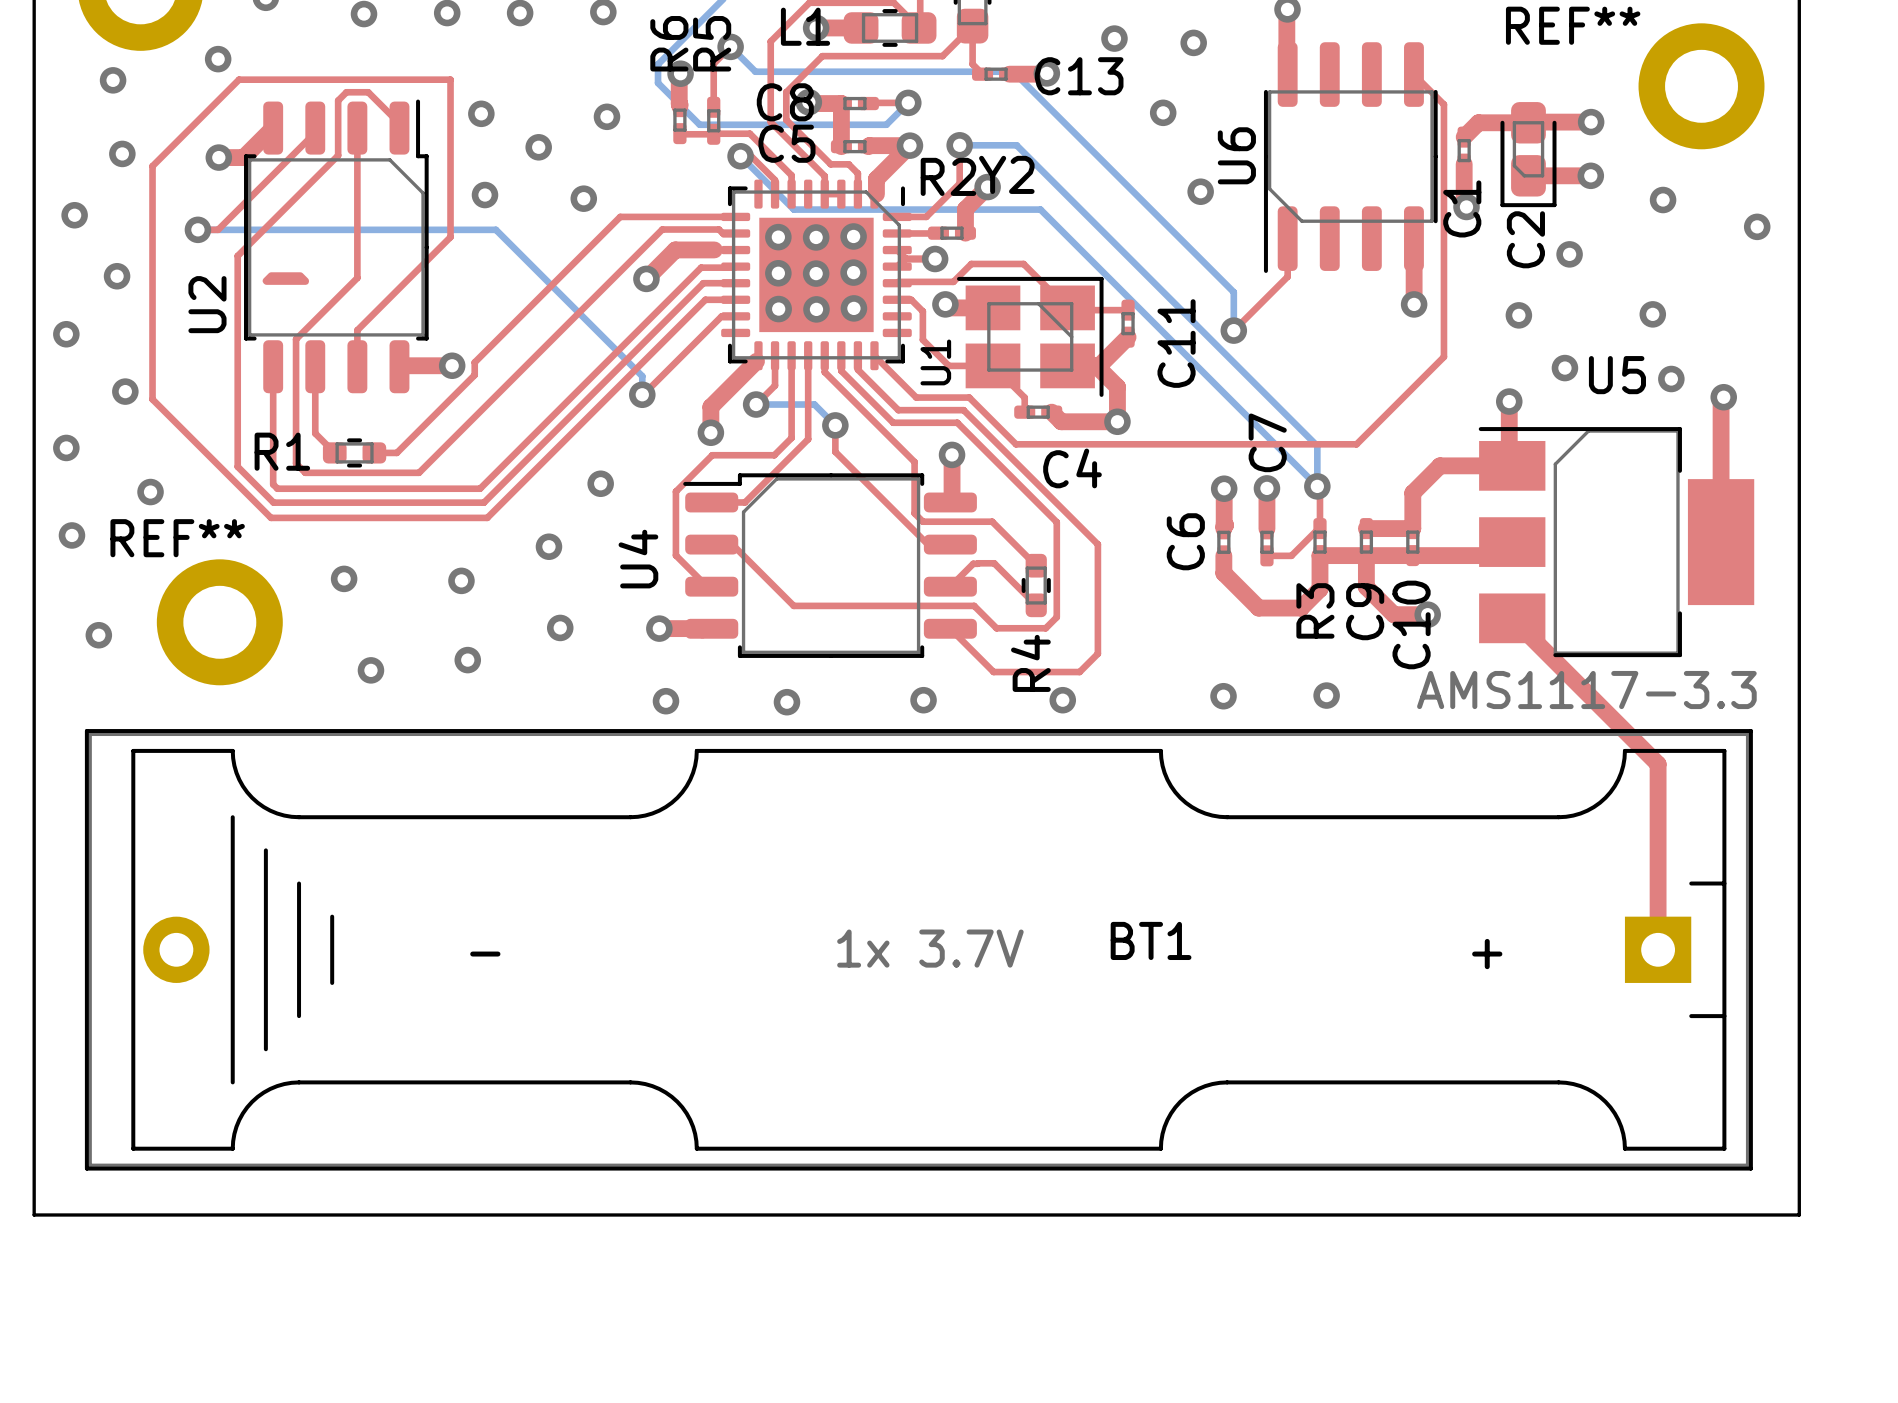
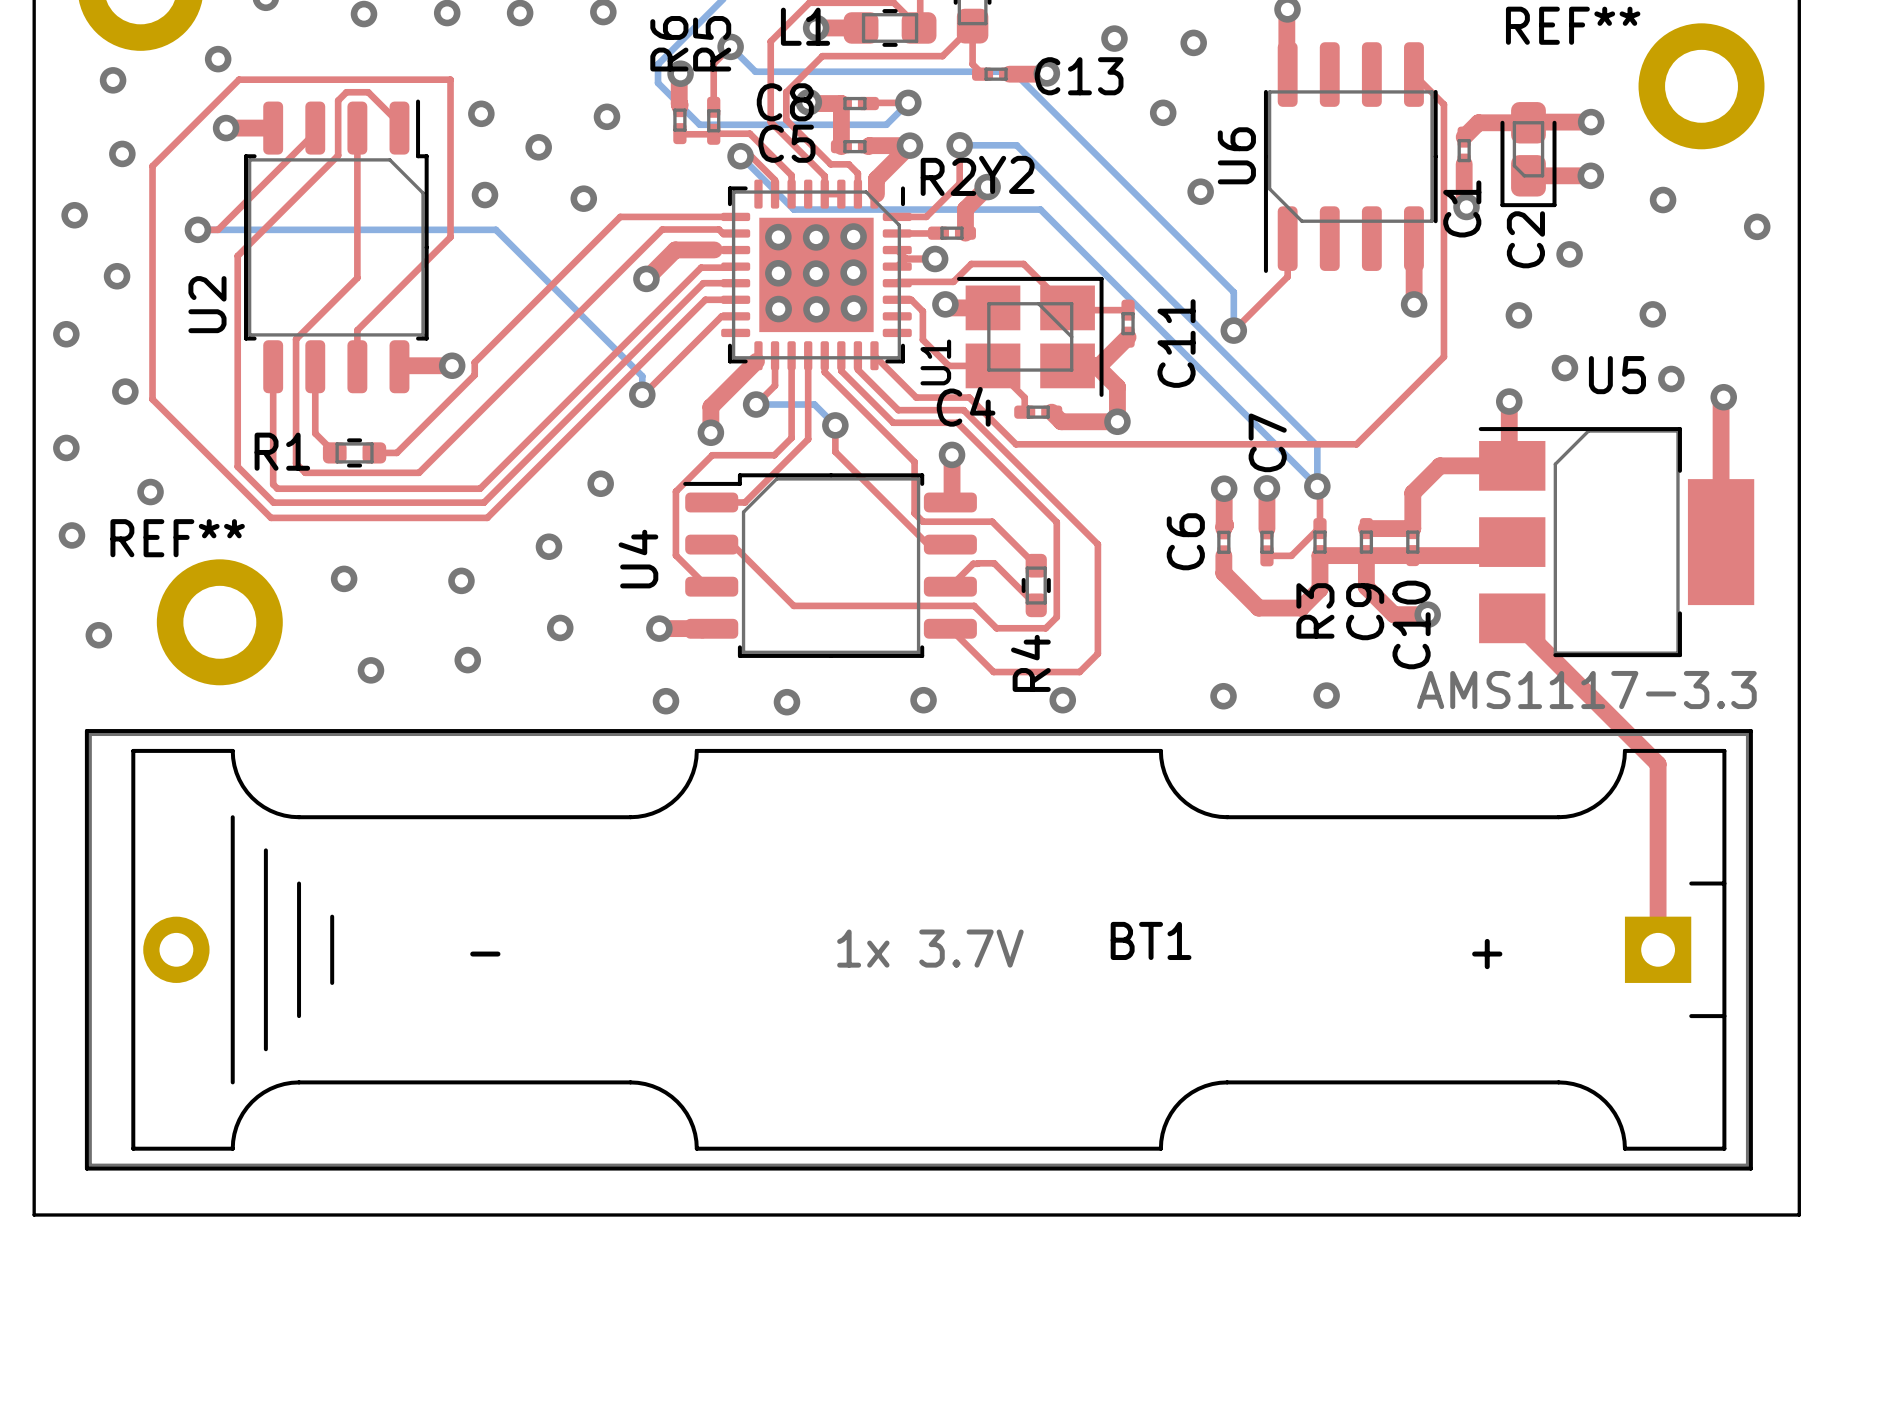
top track: (273, 128) (243, 157) (218, 157) -> (273, 128) (226, 128)
via position: (218, 157) -> (226, 128)
drawing: [262, 272, 309, 285] -> none
C4 name position: C4 (1072, 468) -> C4 (966, 406)

